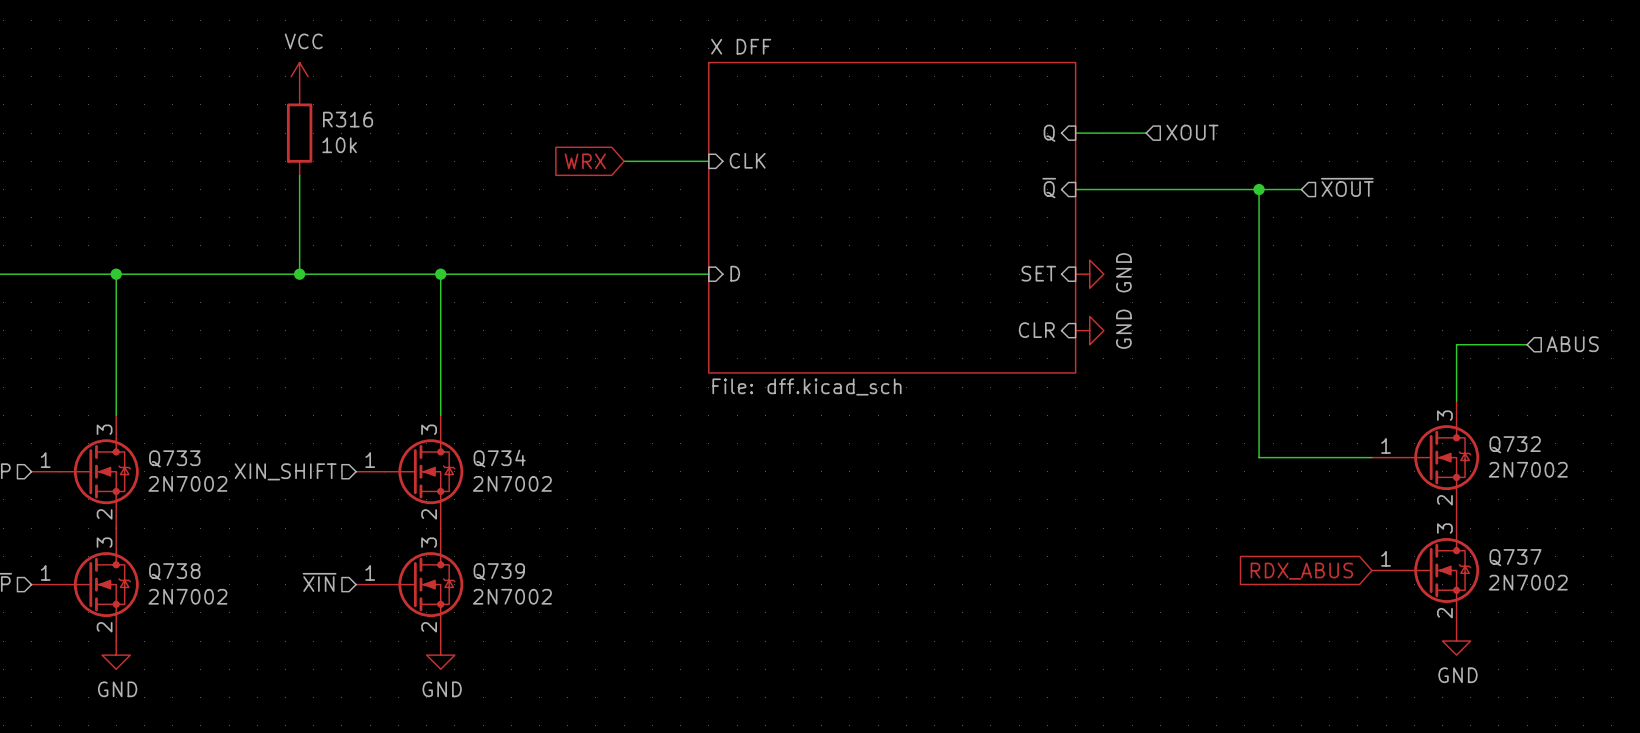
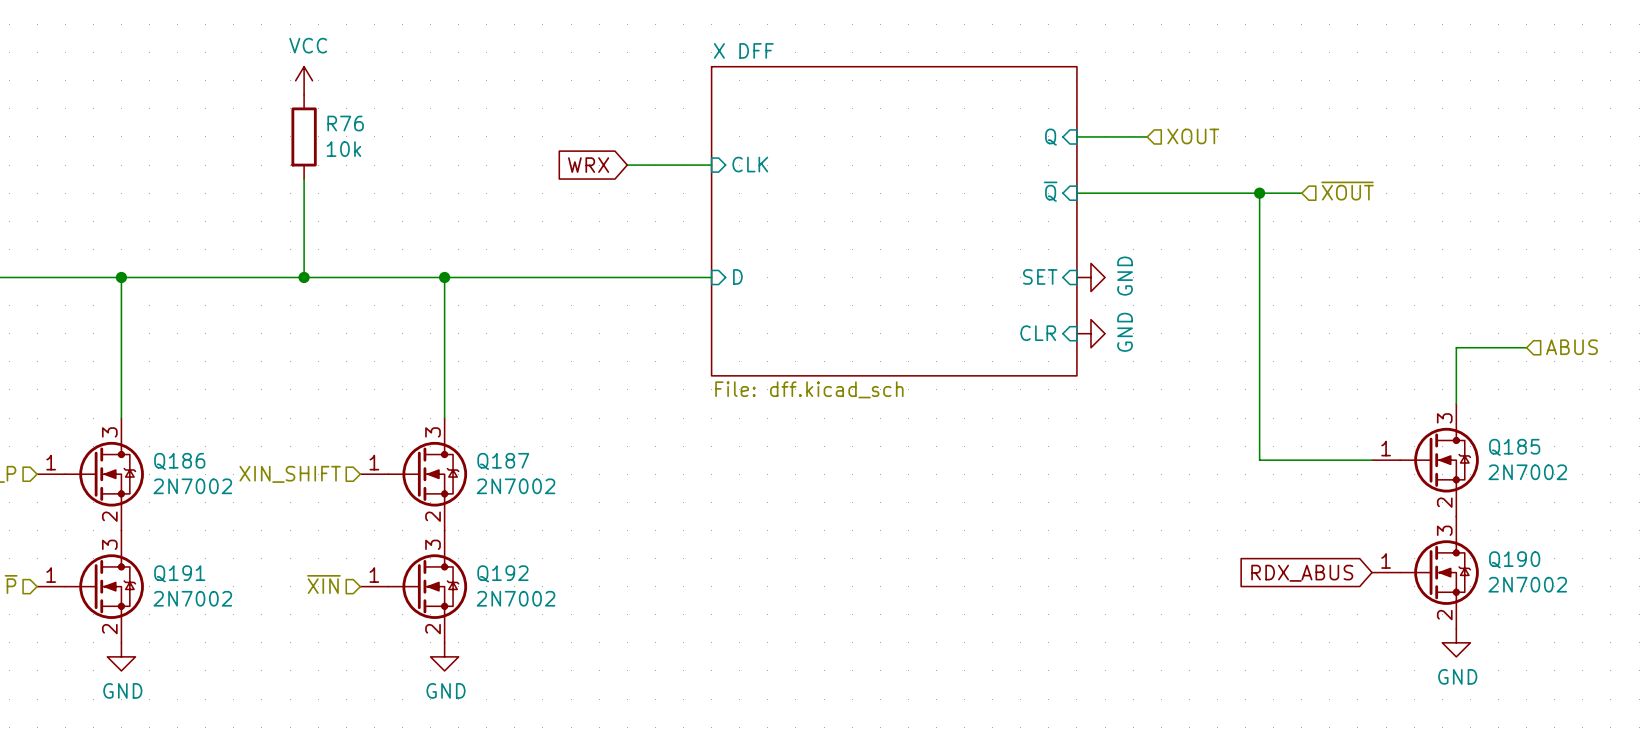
R316 name: R316 (348, 119) -> R76 (345, 123)
Q732 name: Q732 (1515, 444) -> Q185 (1514, 447)
Q733 name: Q733 (174, 458) -> Q186 (179, 461)
Q734 name: Q734 (499, 458) -> Q187 (503, 461)
Q737 name: Q737 (1515, 557) -> Q190 (1514, 559)
Q738 name: Q738 (174, 571) -> Q191 (179, 573)
Q739 name: Q739 (499, 571) -> Q192 (502, 573)

